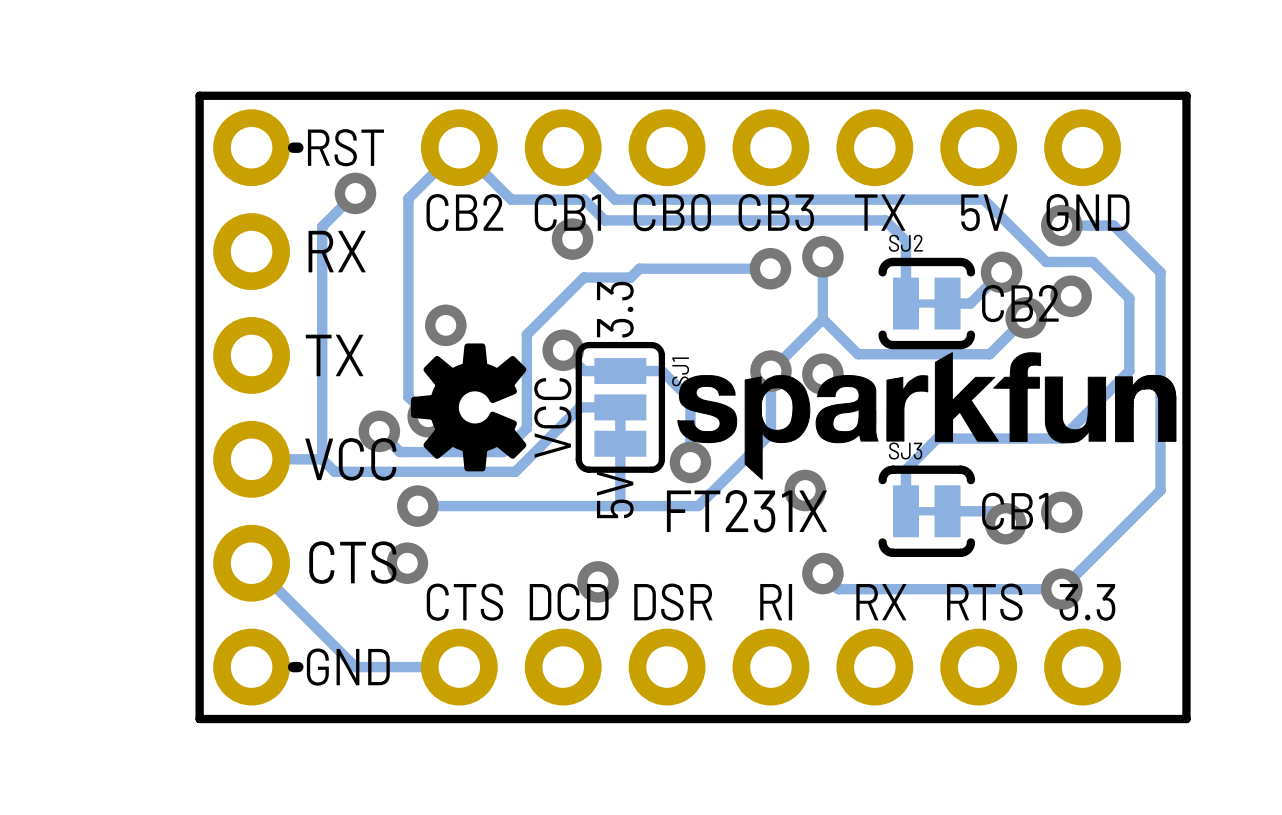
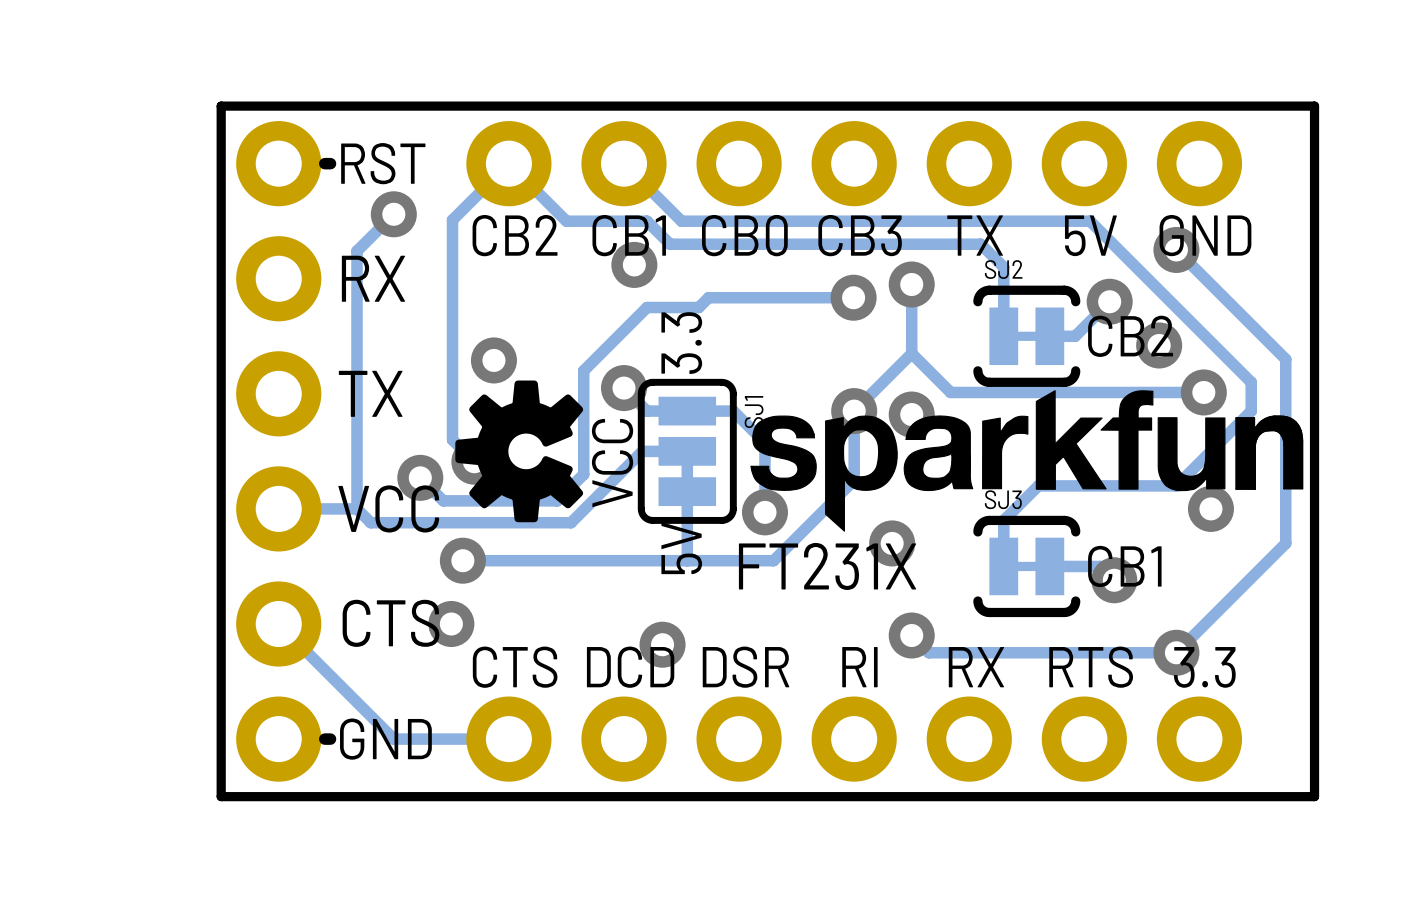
track: (1061, 225) (1113, 225) (1160, 272) (1160, 324) -> (1176, 249) (1285, 359)
track: (1046, 261) (1092, 261) (1129, 298) (1129, 345) -> (1159, 290) (1251, 382)
via: (1071, 296) -> none
via: none -> (1159, 345)
track: (1026, 317) (989, 354) -> (1203, 392) (1096, 392)
via: (1026, 317) -> none
via: none -> (1203, 392)
via position: (1061, 512) -> (1210, 508)

